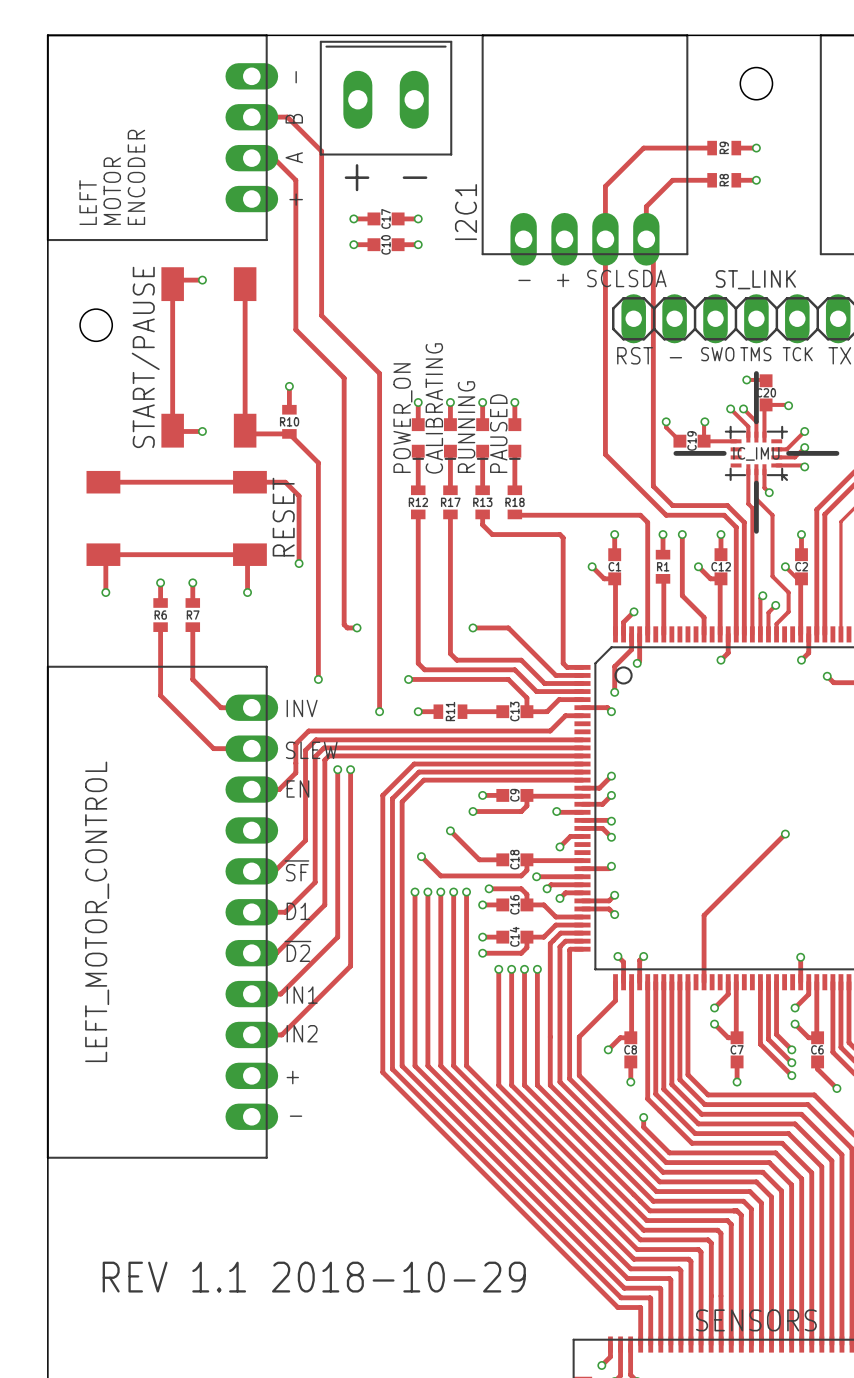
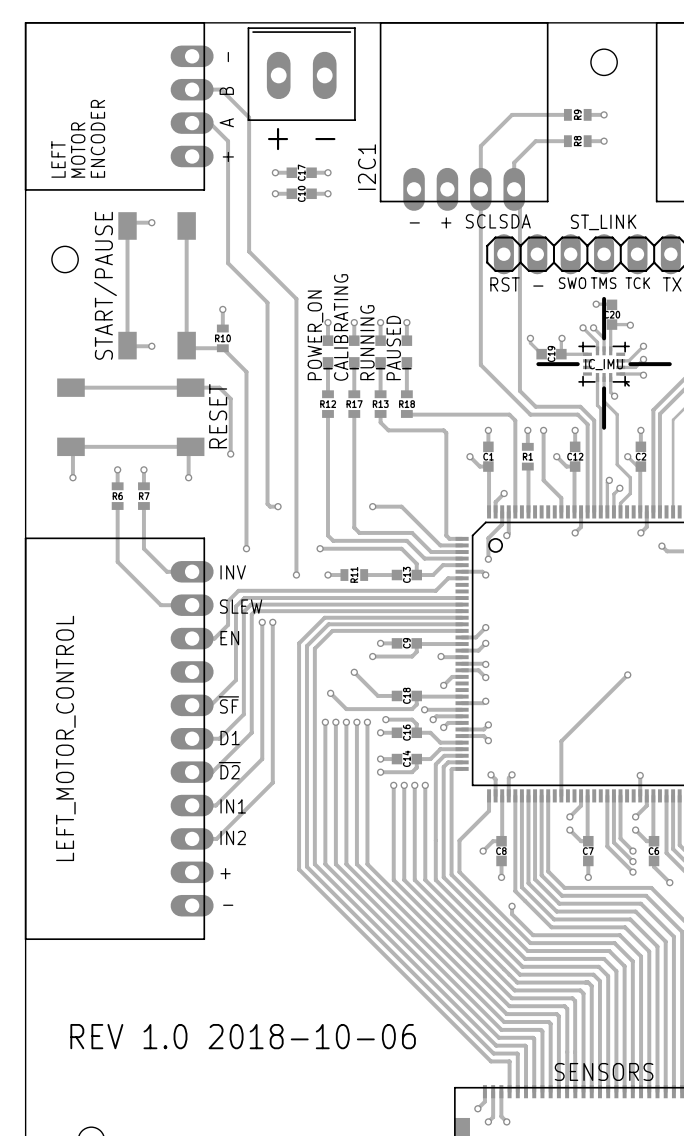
text: REV 1.1 2018-10-29 (314, 1277) -> REV 1.0 2018-10-06 (243, 1036)

